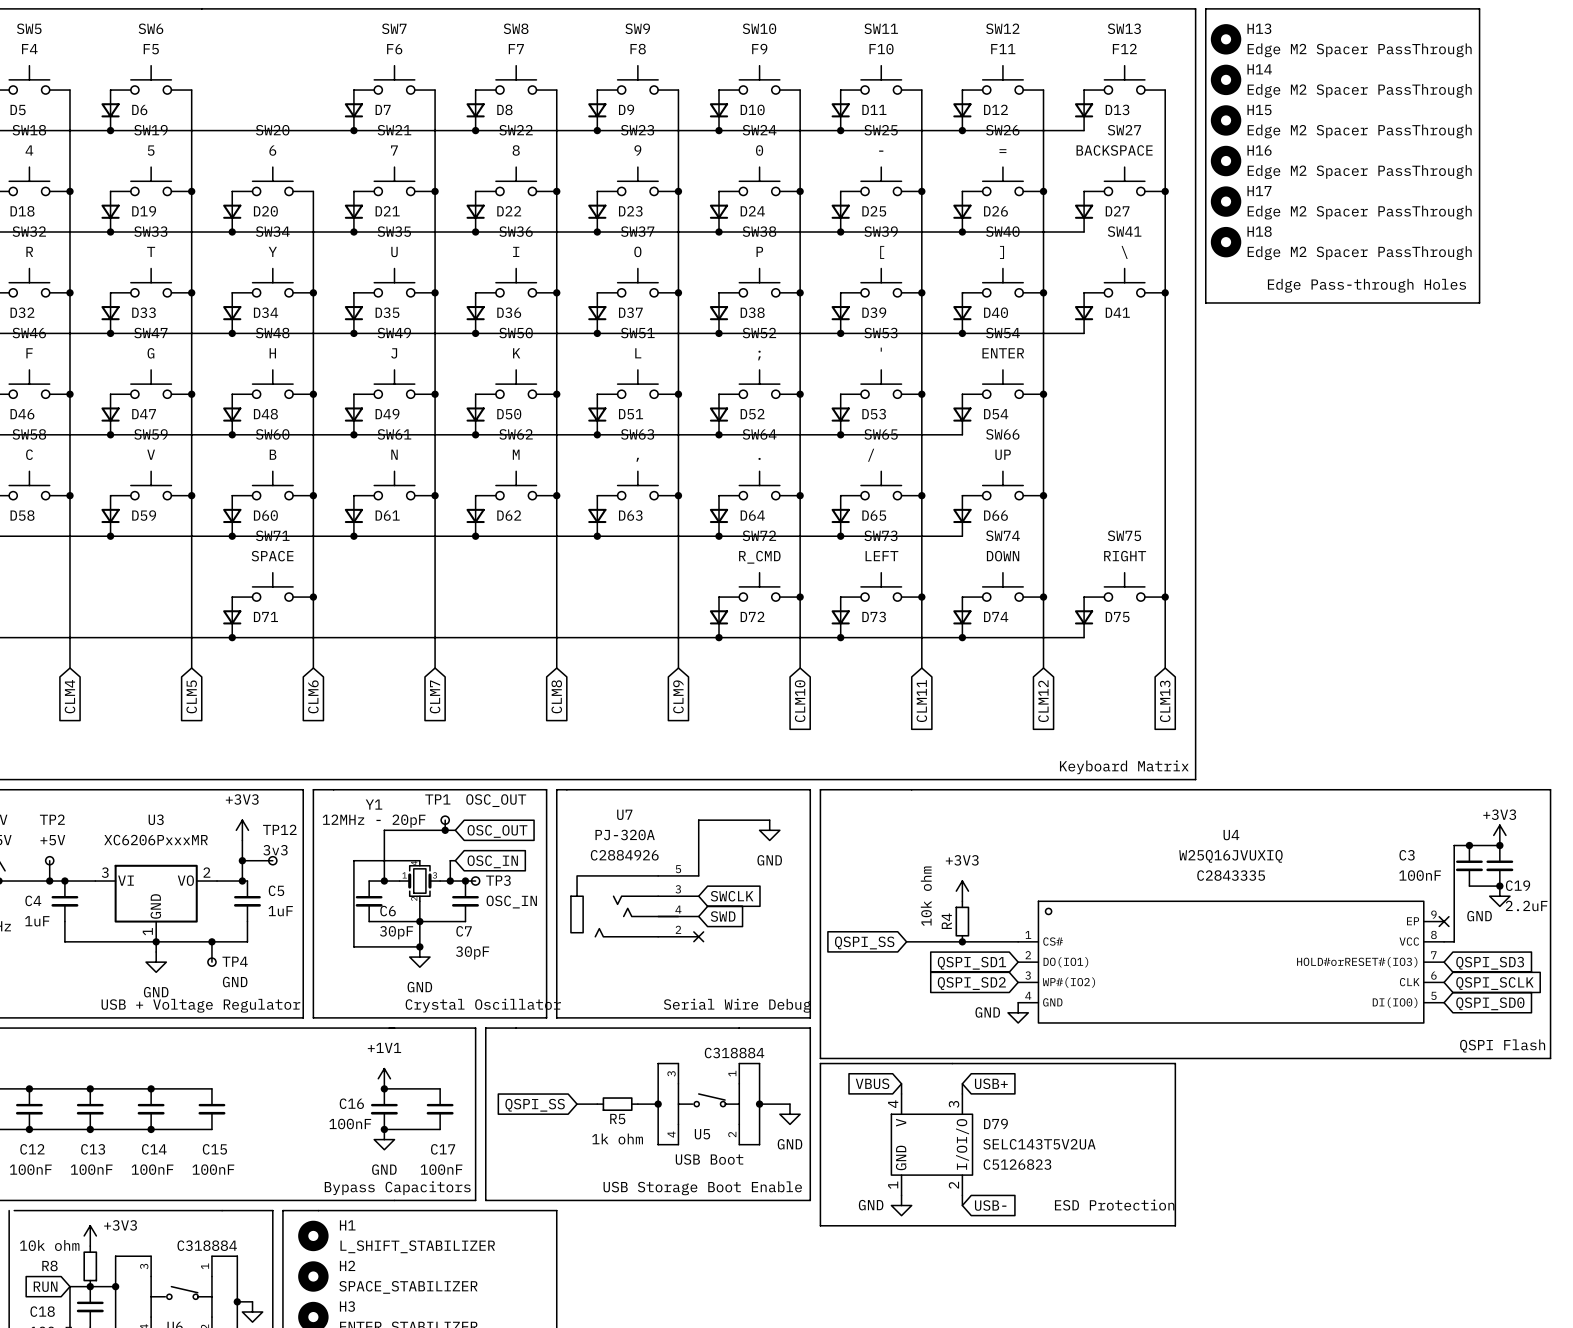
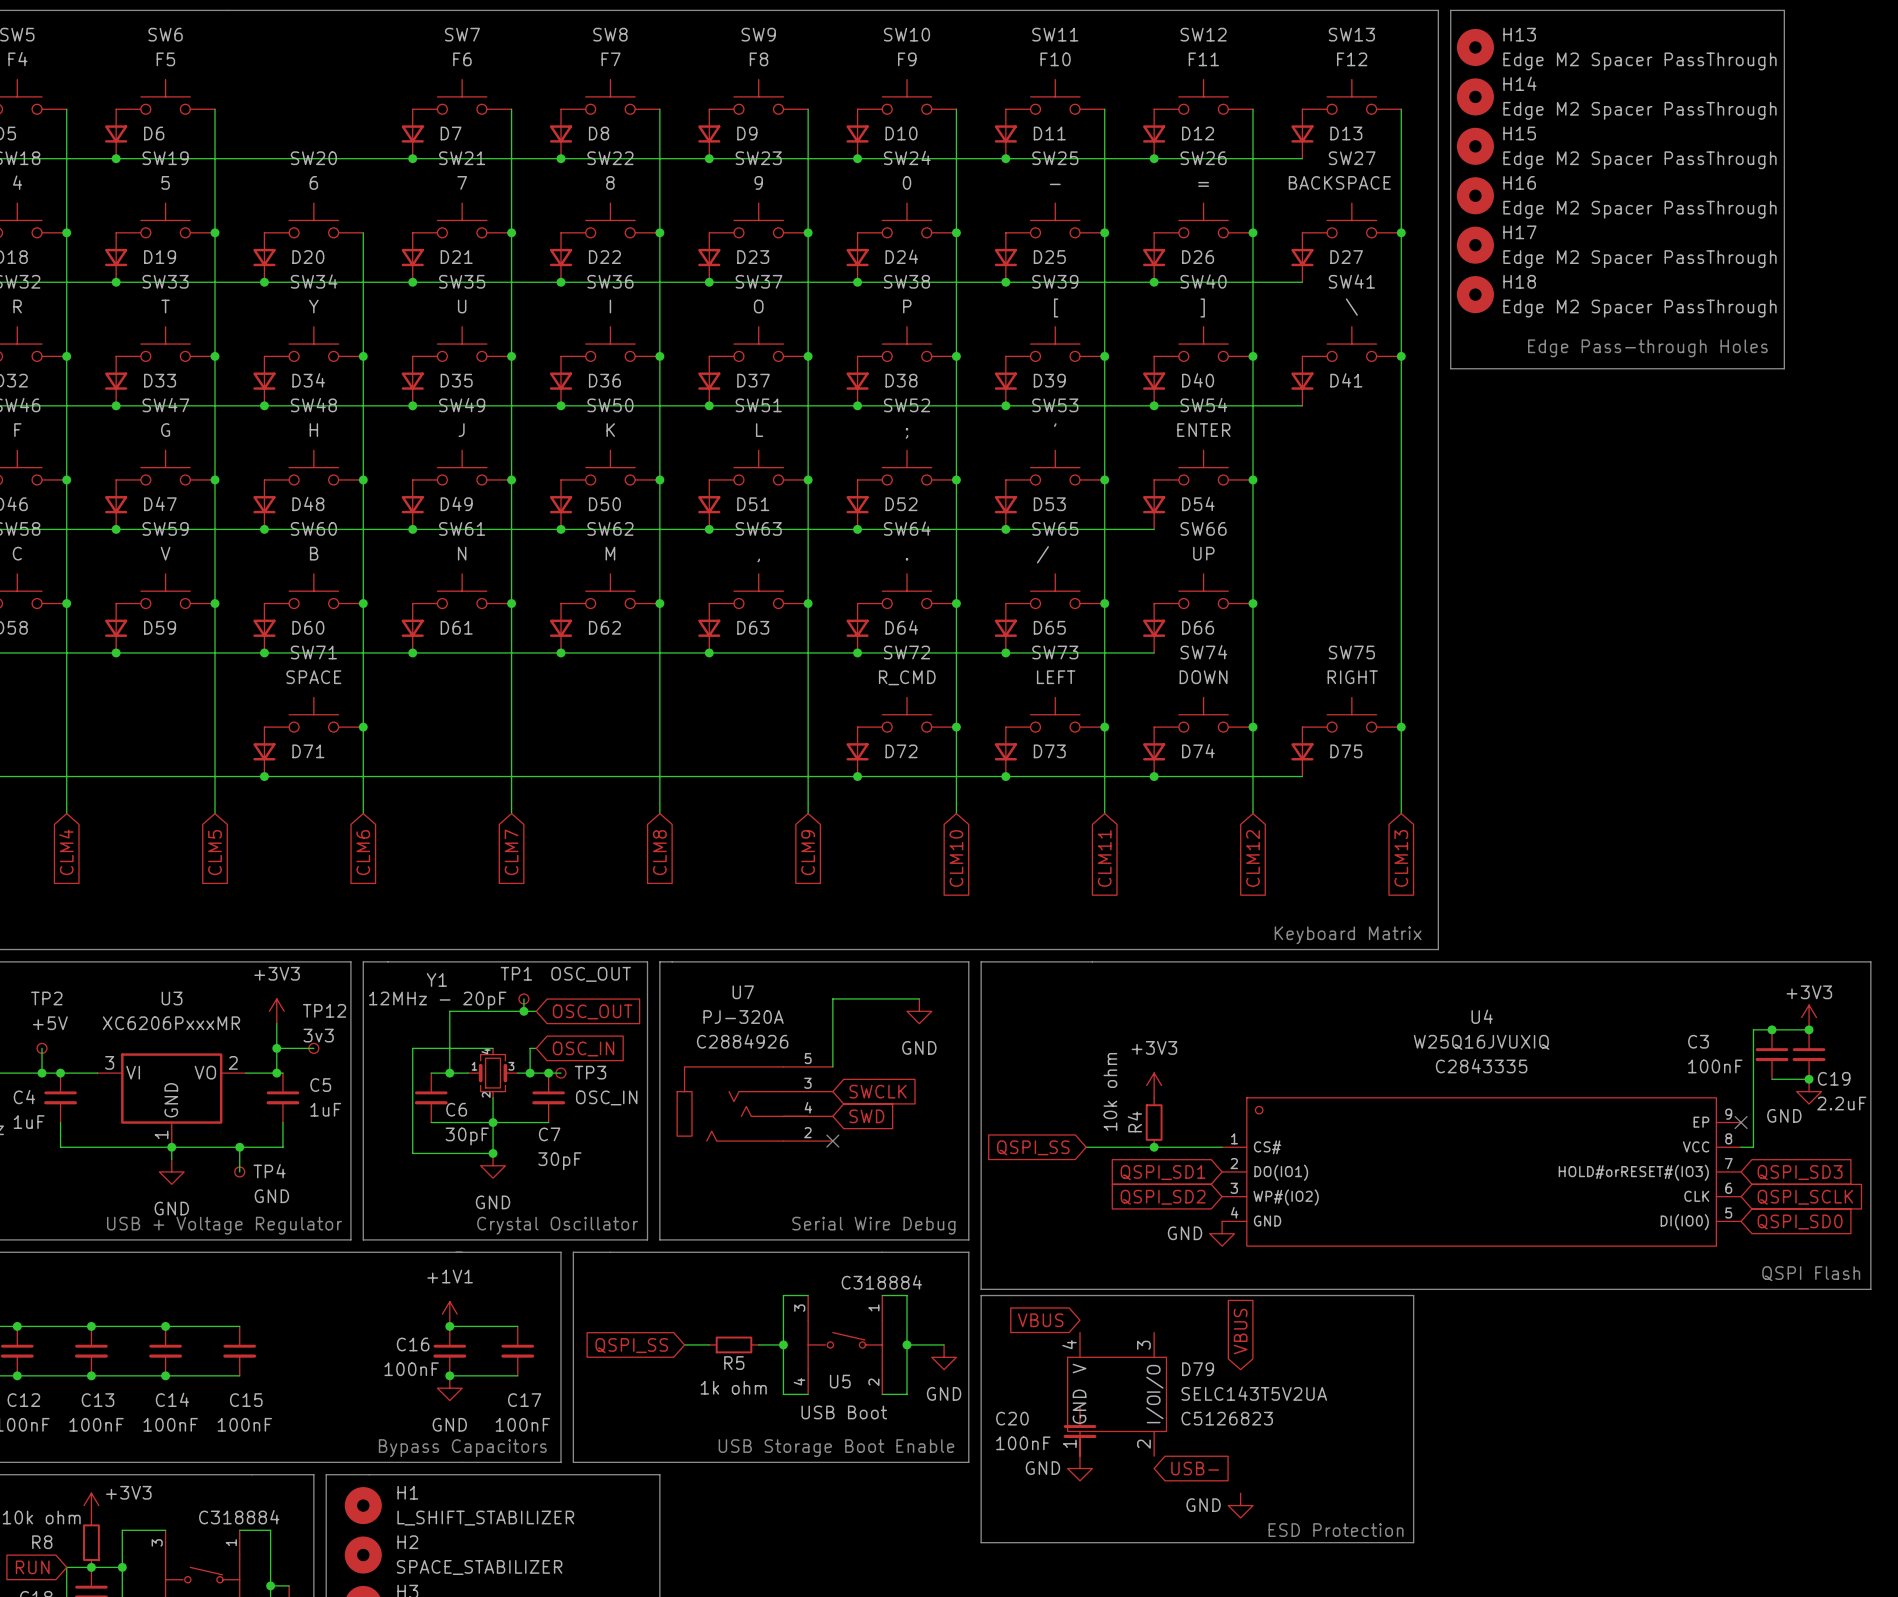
wire: (901, 1083) (901, 1093) -> none
wire: (962, 1083) (962, 1093) -> none
global label: USB+ (991, 1083) -> none
global label: none -> VBUS (1240, 1331)
C20: none -> 100nF (1080, 1431)
wire: (962, 1195) (962, 1205) -> none
text position: ESD Protection (1114, 1205) -> ESD Protection (1336, 1530)
line: (820, 1225) (1175, 1225) -> (981, 1493) (981, 1542) (1413, 1542) (1413, 1493)
power symbol: none -> GND (1240, 1505)

